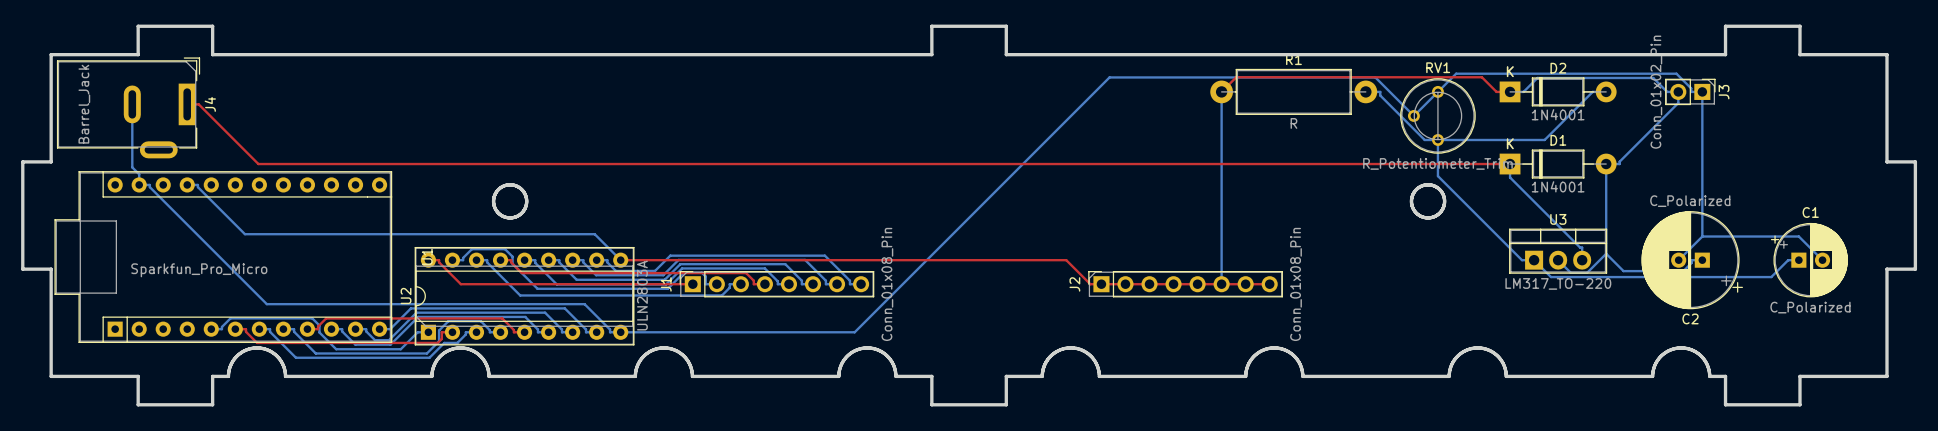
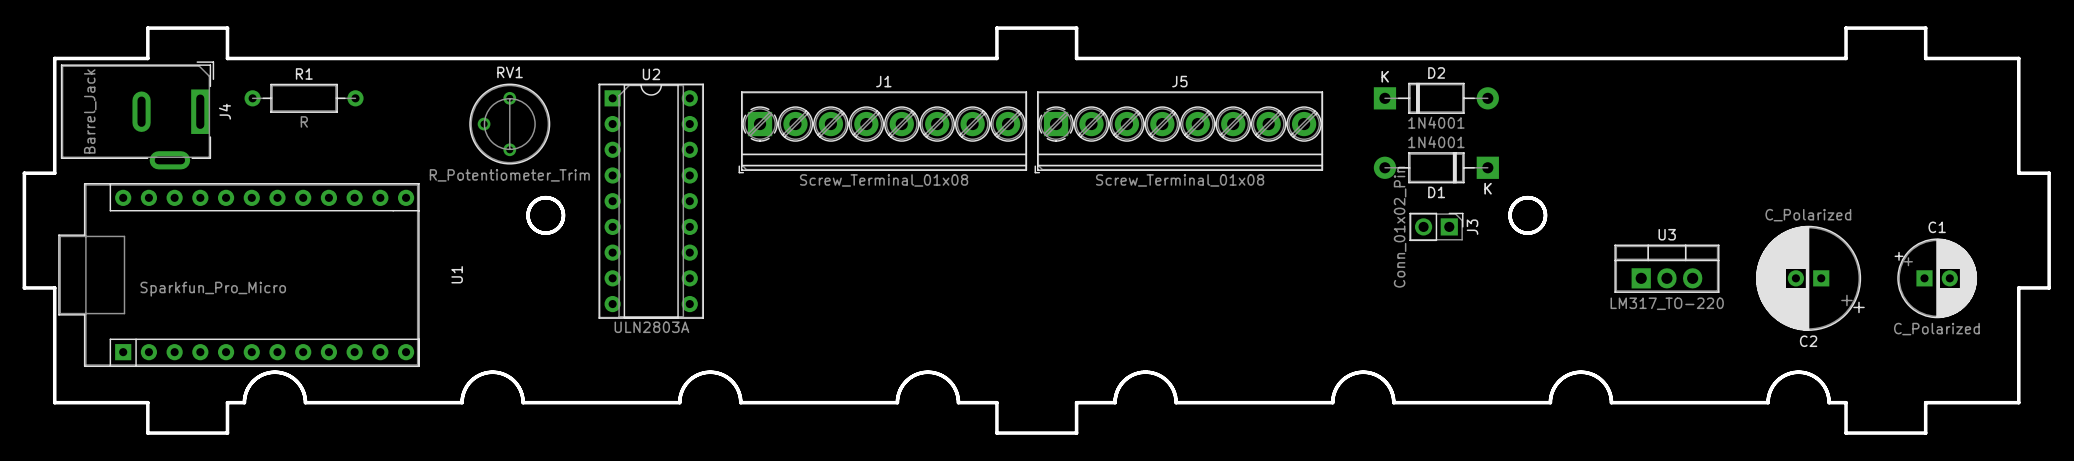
R1 footprint: [1210, 68, 1378, 115] -> [244, 83, 364, 113]
bottom track: (1221, 91) (1221, 284) -> none
top track: (1221, 91) (1236, 77) (1481, 77) (1496, 91) (1510, 91) -> none
bottom track: (1365, 91) (1380, 91) (1380, 95) (1424, 139) (1544, 139) (1592, 91) (1606, 91) -> none
bottom track: (1510, 91) (1523, 91) (1537, 77) (1653, 77) (1667, 91) (1678, 91) (1678, 103) (1619, 161) (1619, 164) (1606, 164) (1606, 253) -> none
D2 position: (1558, 91) -> (1436, 98)
J3 position: (1690, 91) -> (1436, 226)
bottom track: (132, 104) (132, 167) (139, 174) (139, 184) (149, 184) (149, 187) (266, 304) (584, 304) (610, 329) (610, 332) (854, 332) (1109, 77) (1375, 77) (1413, 115) (1456, 73) (1676, 73) (1691, 88) (1691, 91) (1702, 91) (1702, 236) -> none
top track: (187, 104) (198, 104) (258, 164) (1510, 164) -> none
RV1 position: (1437, 115) -> (509, 124)
J5: none -> Screw_Terminal_01x08 (1178, 132)
bottom track: (1437, 139) (1437, 176) (1522, 260) (1534, 260) (1551, 277) (1771, 277) (1788, 260) (1798, 260) -> none
bottom track: (1510, 164) (1510, 177) (1582, 247) (1582, 260) -> none
D1 rotation: 0° (1558, 164) -> 180° (1436, 167)
D1 position: (1558, 164) -> (1436, 167)
bottom track: (187, 184) (197, 184) (197, 187) (244, 234) (594, 234) (620, 260) -> none
bottom track: (1702, 236) (1798, 236) (1822, 260) -> none
bottom track: (1702, 236) (1678, 260) -> none
bottom track: (1606, 253) (1623, 271) (1683, 271) (1691, 262) (1691, 260) (1702, 260) -> none
bottom track: (1606, 253) (1587, 272) (1570, 272) (1558, 260) -> none
top track: (428, 260) (439, 260) (460, 284) (692, 284) -> none
bottom track: (452, 260) (463, 260) (471, 249) (505, 249) (512, 256) (512, 263) (537, 288) (667, 288) (683, 272) (701, 272) (705, 276) (705, 284) (716, 284) -> none
bottom track: (476, 260) (487, 260) (487, 262) (520, 295) (721, 295) (729, 287) (729, 284) (740, 284) -> none
top track: (500, 260) (511, 260) (521, 273) (746, 273) (753, 280) (753, 284) (764, 284) -> none
bottom track: (524, 260) (535, 260) (535, 262) (556, 284) (666, 284) (682, 268) (764, 268) (777, 281) (777, 284) (788, 284) -> none
bottom track: (548, 260) (559, 260) (576, 279) (664, 279) (680, 264) (785, 264) (801, 280) (801, 284) (813, 284) -> none
bottom track: (572, 260) (583, 260) (596, 275) (663, 275) (678, 259) (805, 259) (825, 280) (825, 284) (837, 284) -> none
bottom track: (596, 260) (607, 260) (615, 270) (655, 270) (670, 255) (824, 255) (849, 280) (849, 284) (861, 284) -> none
top track: (620, 260) (1066, 260) (1090, 284) (1269, 284) -> none
J1 footprint: [679, 271, 875, 298] -> [738, 91, 1028, 174]
J1 name position: J1 (666, 284) -> J1 (883, 81)
J1 value: Conn_01x08_Pin (887, 284) -> Screw_Terminal_01x08 (884, 180)
J2: Conn_01x08_Pin (1185, 284) -> none
U2 rotation: 0° (524, 296) -> 90° clockwise (651, 201)
U2 position: (524, 296) -> (651, 201)
bottom track: (211, 329) (221, 329) (230, 318) (312, 318) (319, 325) (319, 332) (336, 349) (400, 349) (417, 332) (428, 332) -> none
top track: (235, 329) (245, 329) (245, 331) (257, 342) (437, 342) (441, 339) (441, 332) (452, 332) -> none
bottom track: (259, 329) (270, 329) (270, 331) (295, 357) (429, 357) (444, 342) (457, 342) (465, 332) (476, 332) -> none
bottom track: (283, 329) (294, 329) (294, 331) (315, 353) (426, 353) (439, 341) (439, 330) (448, 321) (480, 321) (489, 332) (500, 332) -> none
top track: (307, 329) (318, 329) (318, 326) (326, 318) (502, 318) (513, 332) (524, 332) -> none
bottom track: (331, 329) (342, 329) (355, 344) (390, 344) (418, 316) (525, 316) (537, 329) (537, 332) (548, 332) -> none
bottom track: (355, 329) (366, 329) (374, 340) (388, 340) (416, 312) (545, 312) (562, 329) (562, 332) (572, 332) -> none
bottom track: (379, 329) (390, 329) (410, 308) (564, 308) (586, 329) (586, 332) (596, 332) -> none

